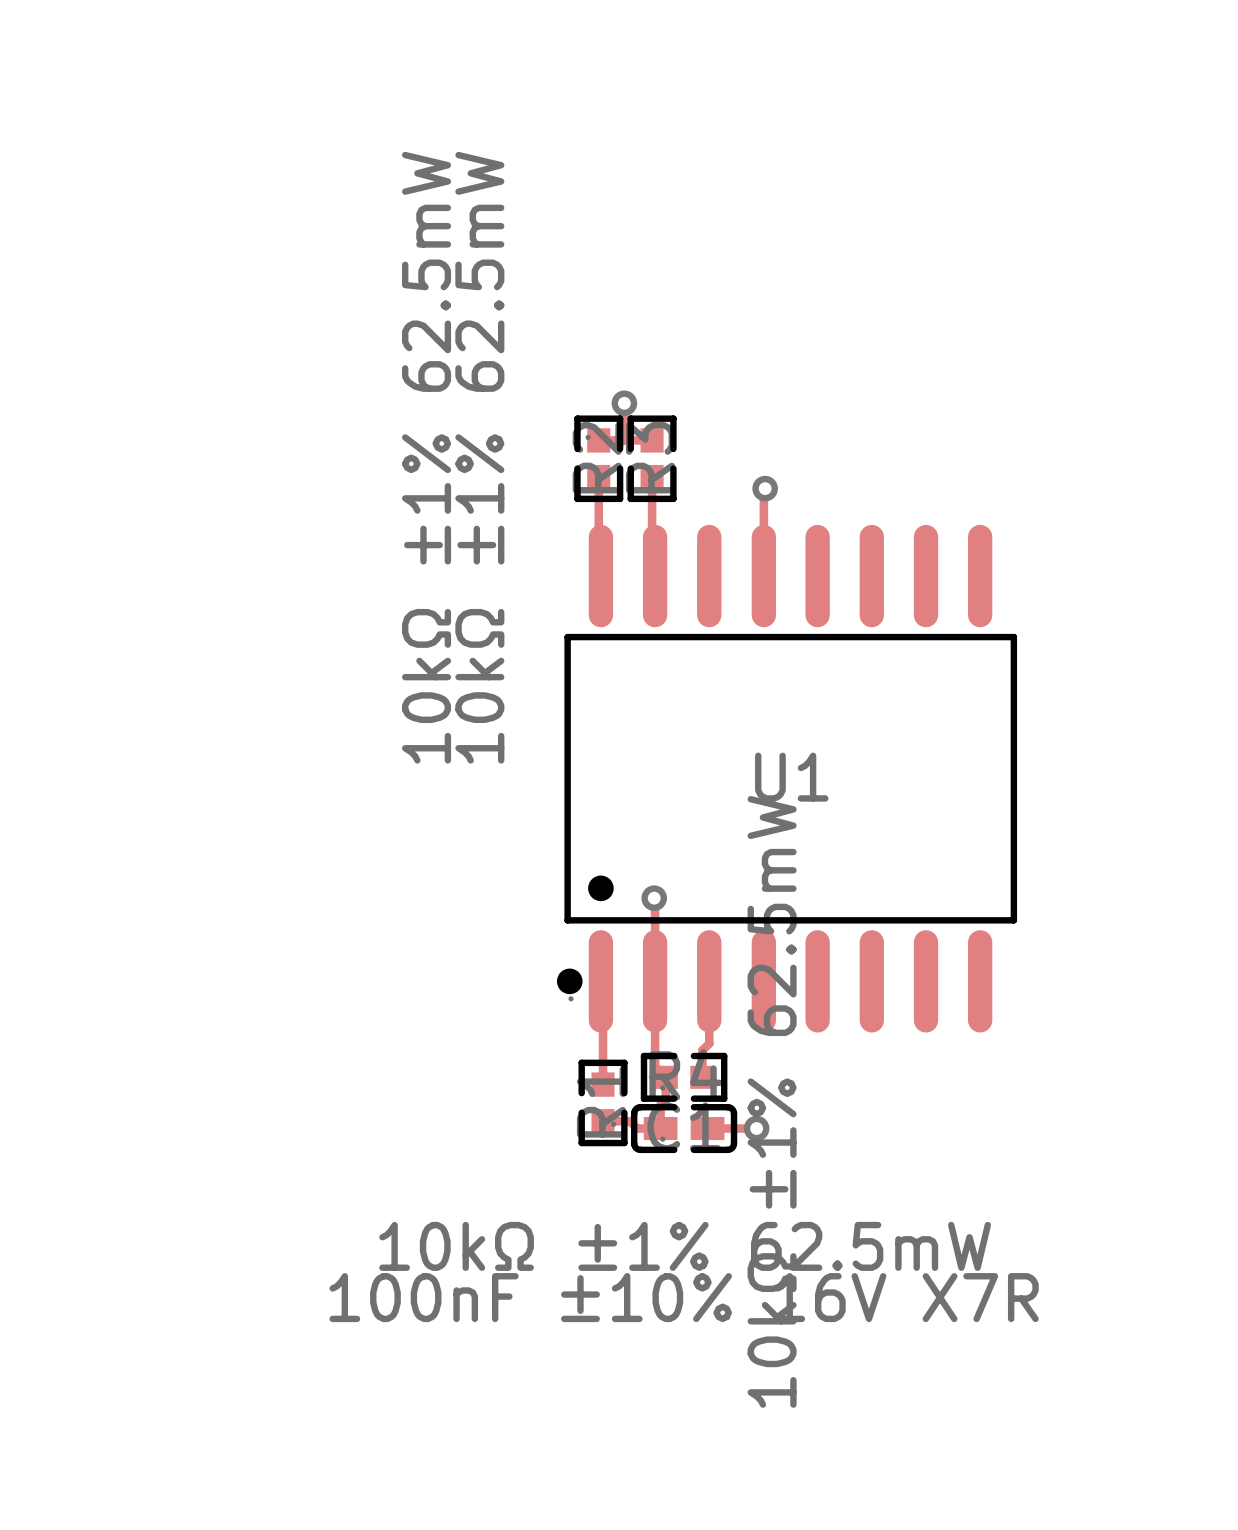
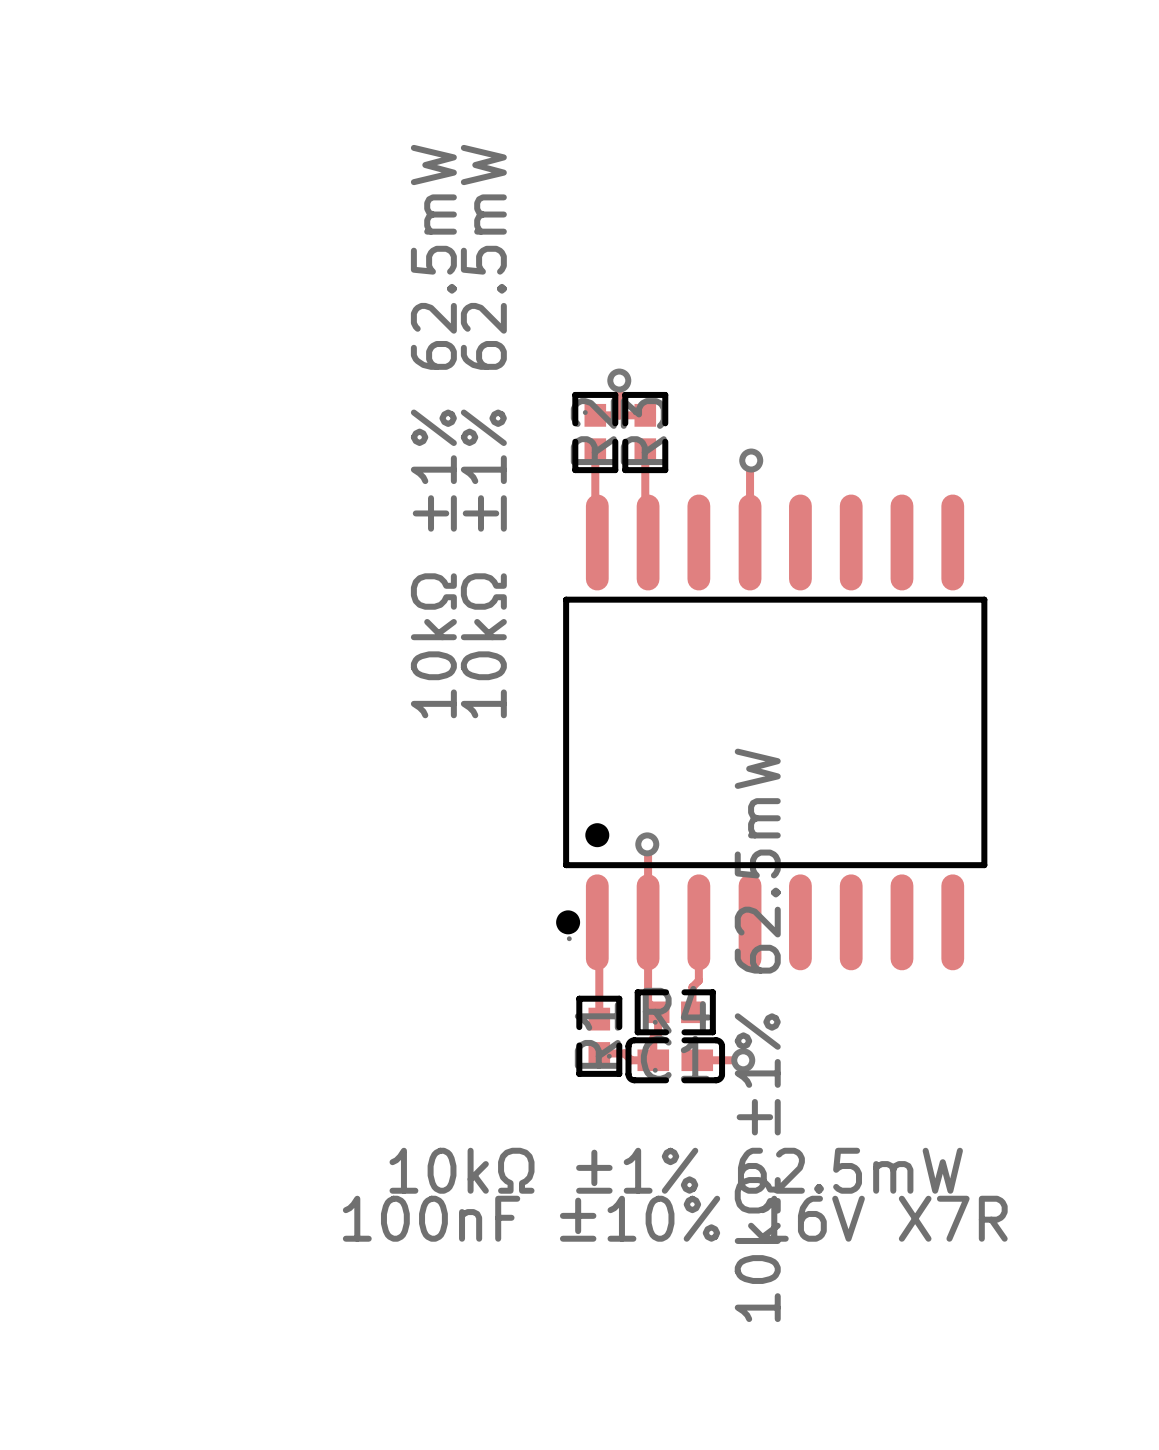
U1 name: U1 (791, 777) -> none

